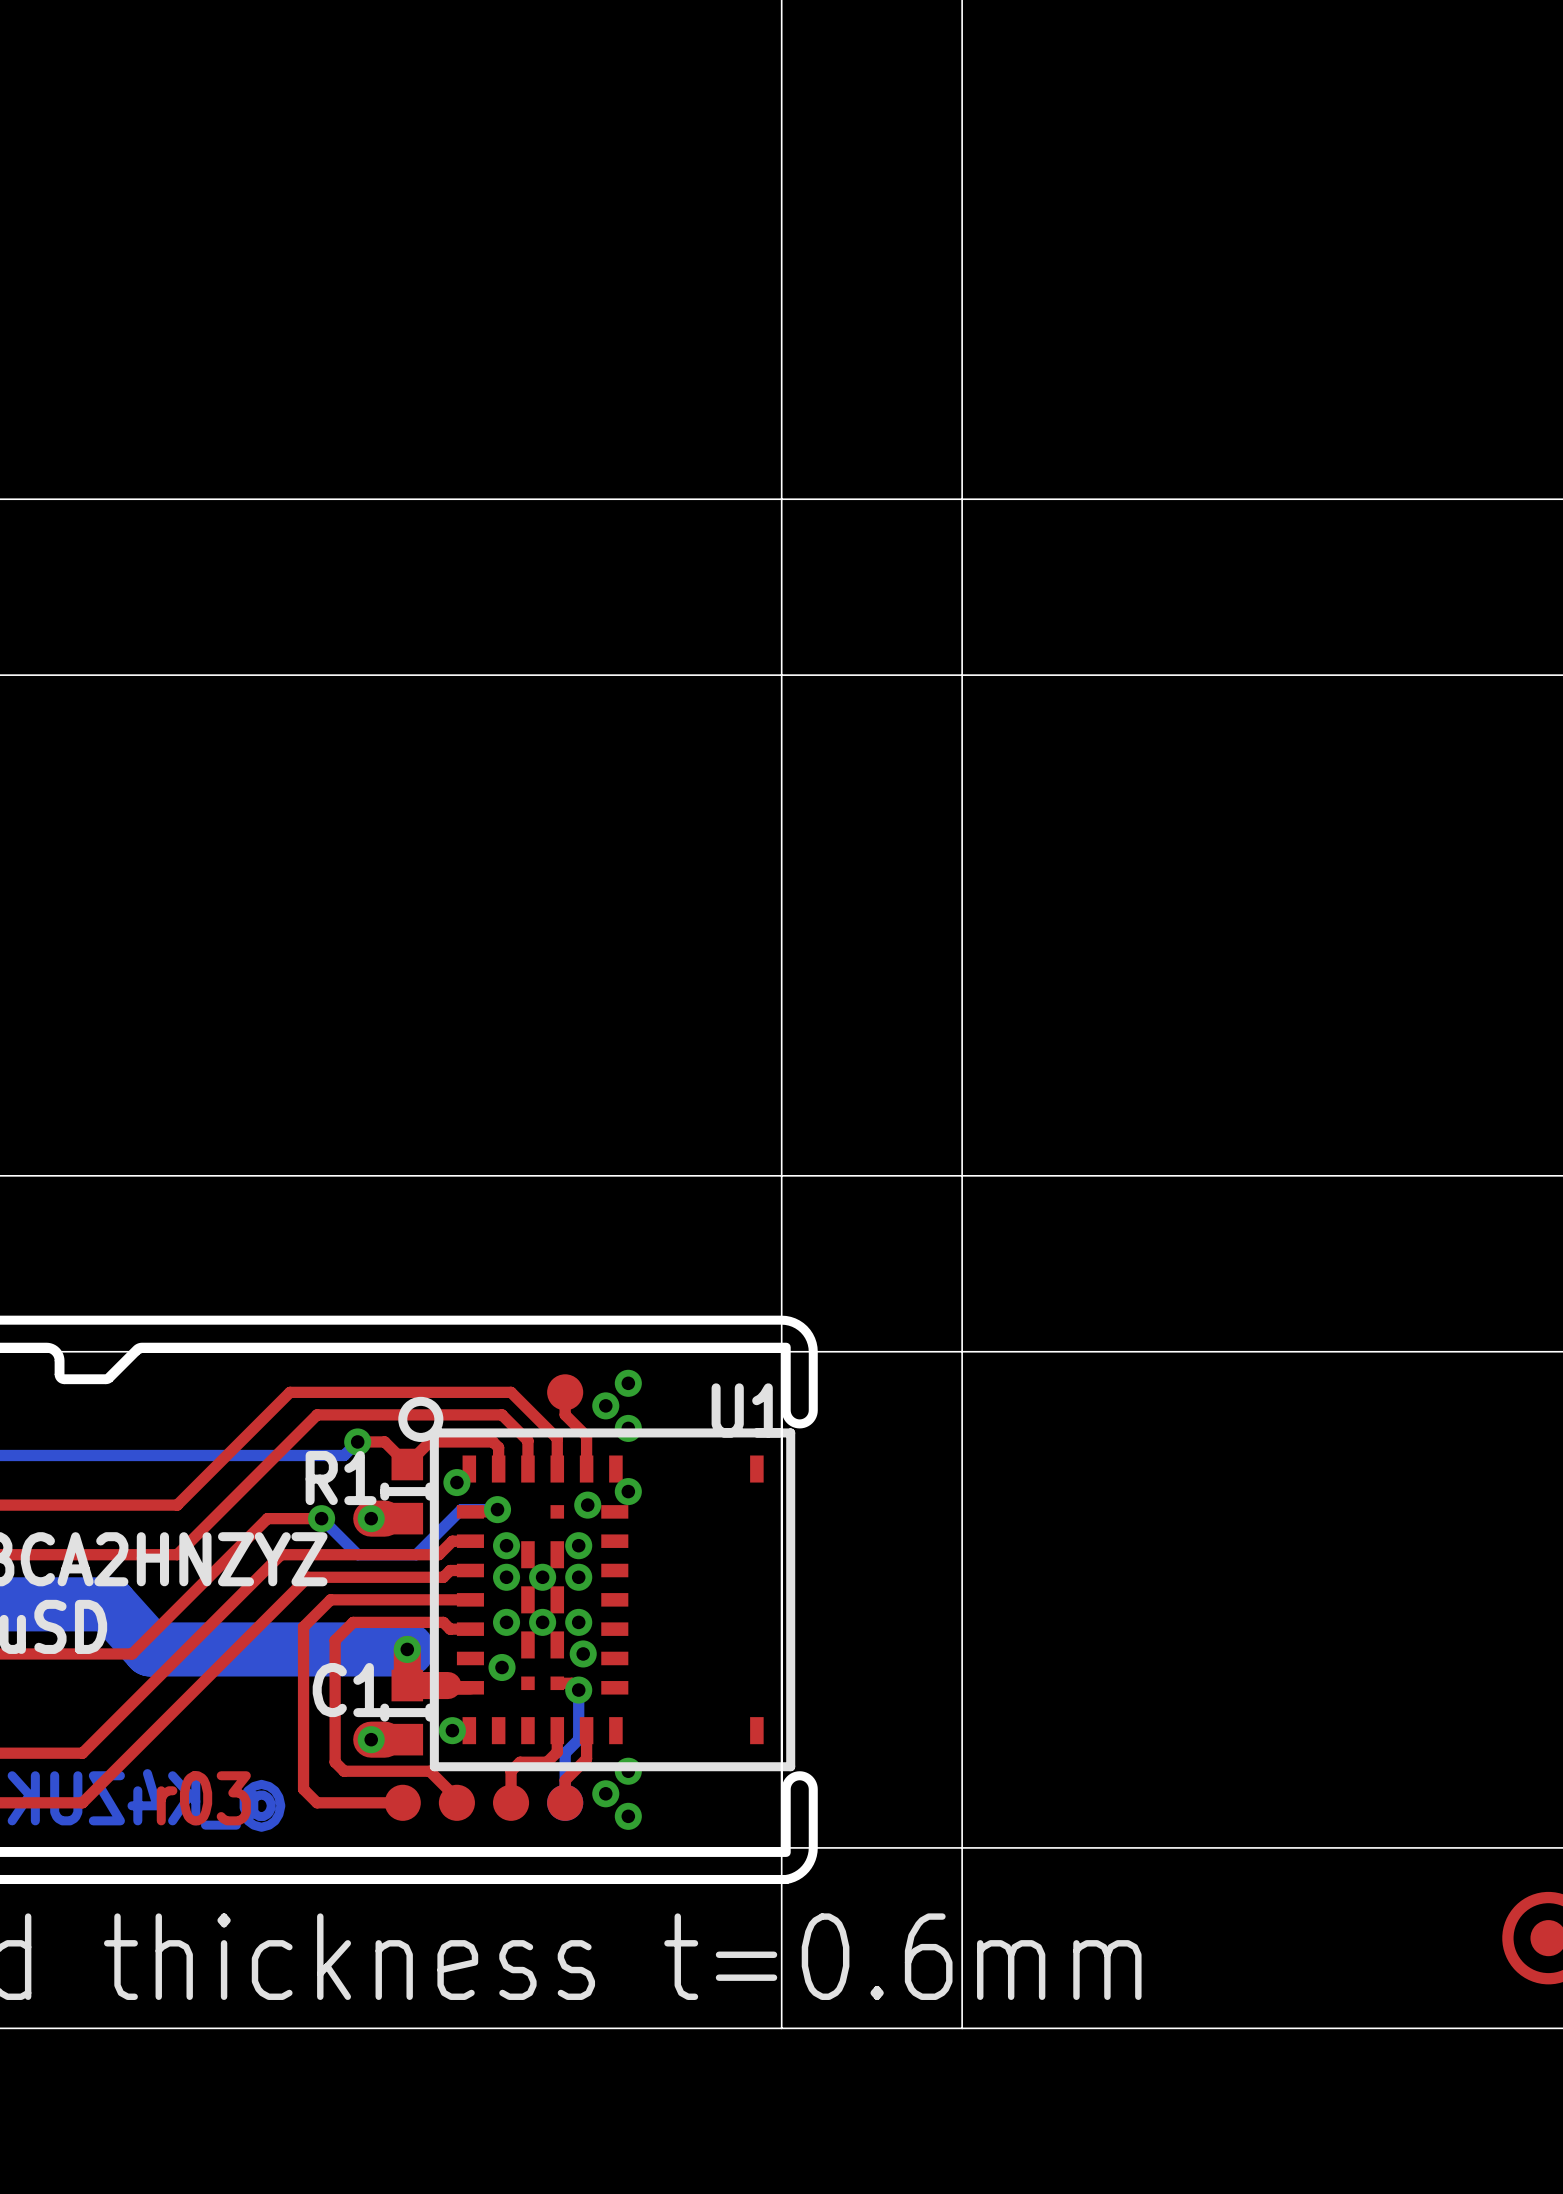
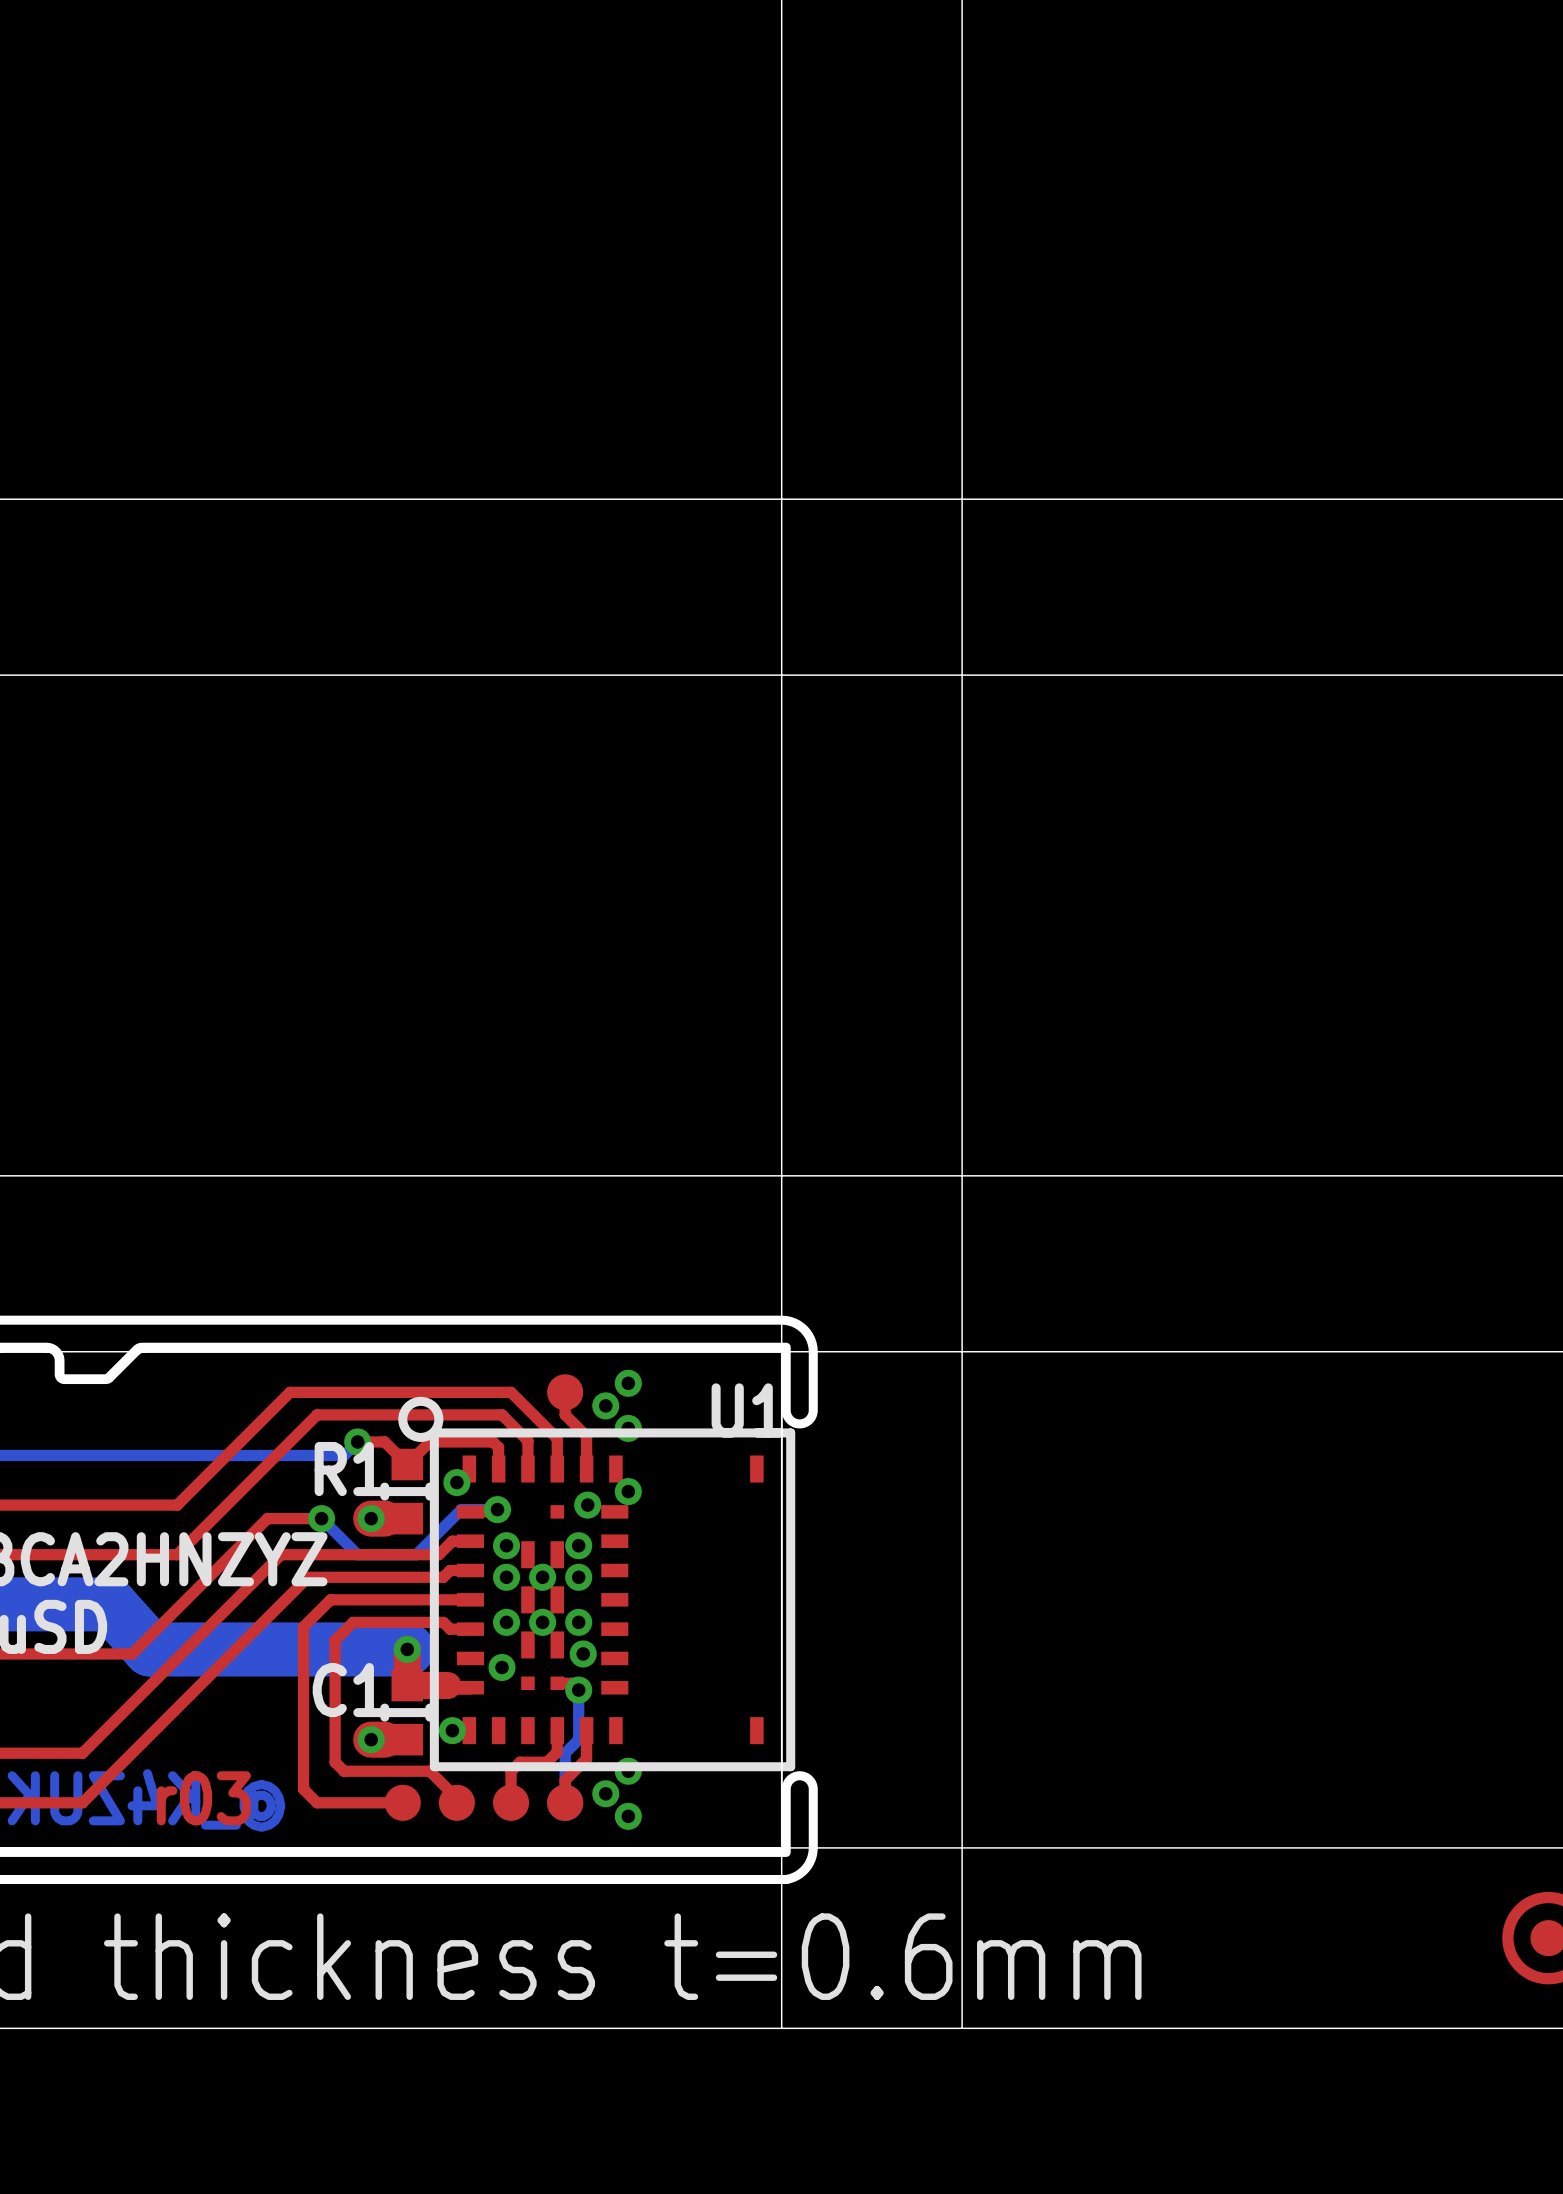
R1 name position: R1 (341, 1478) -> R1 (350, 1469)

